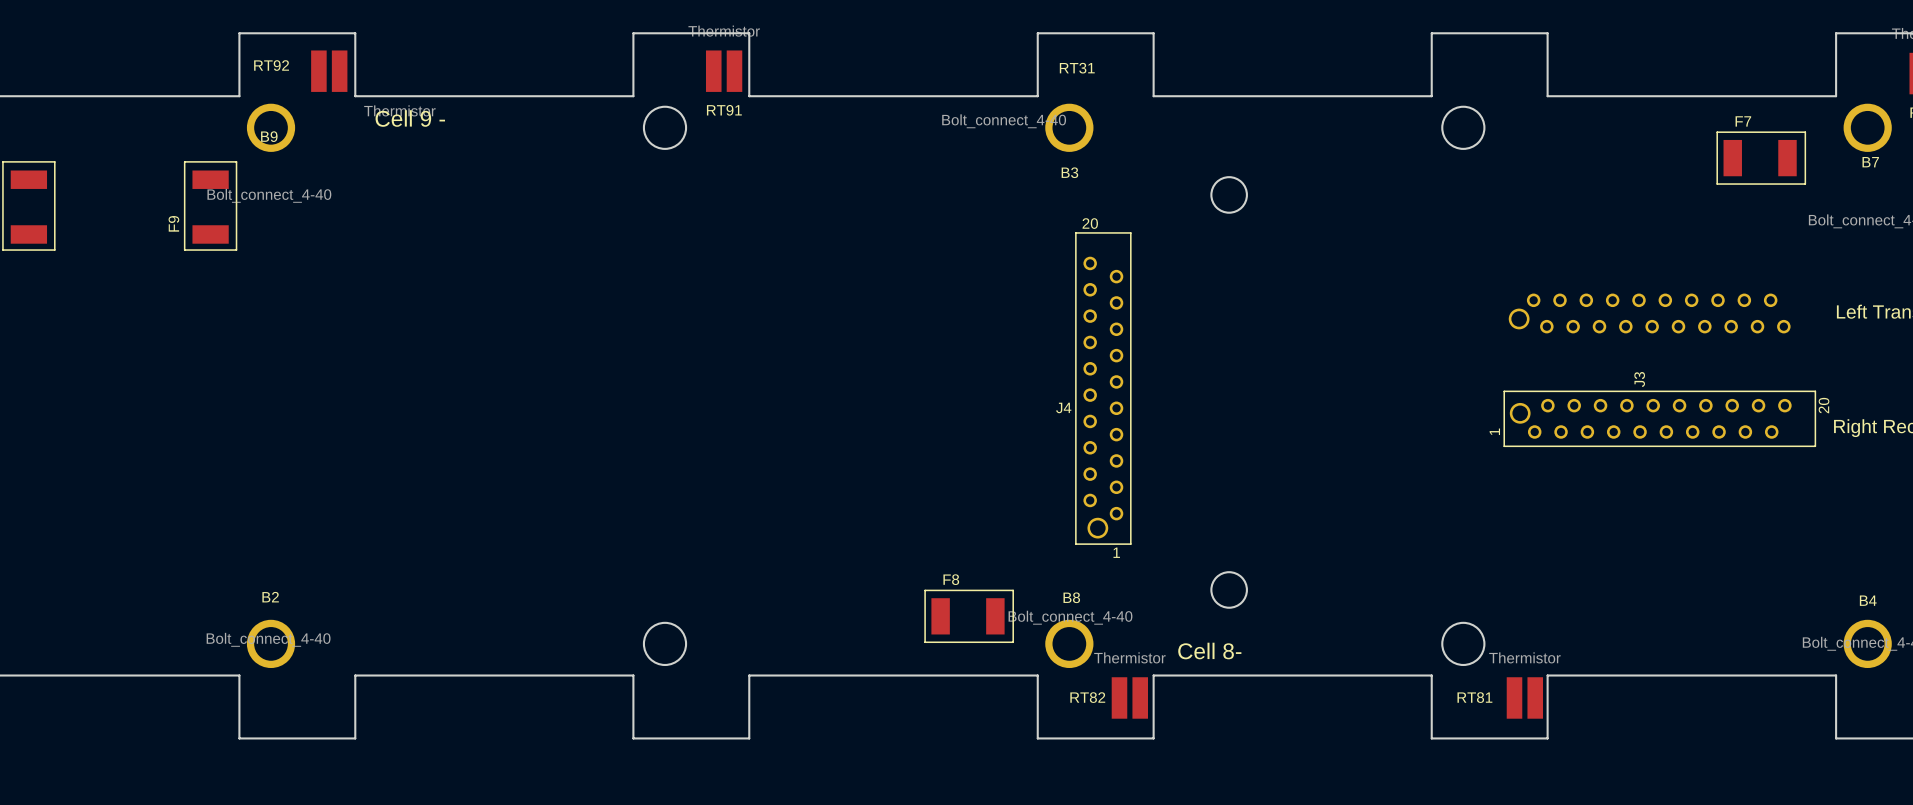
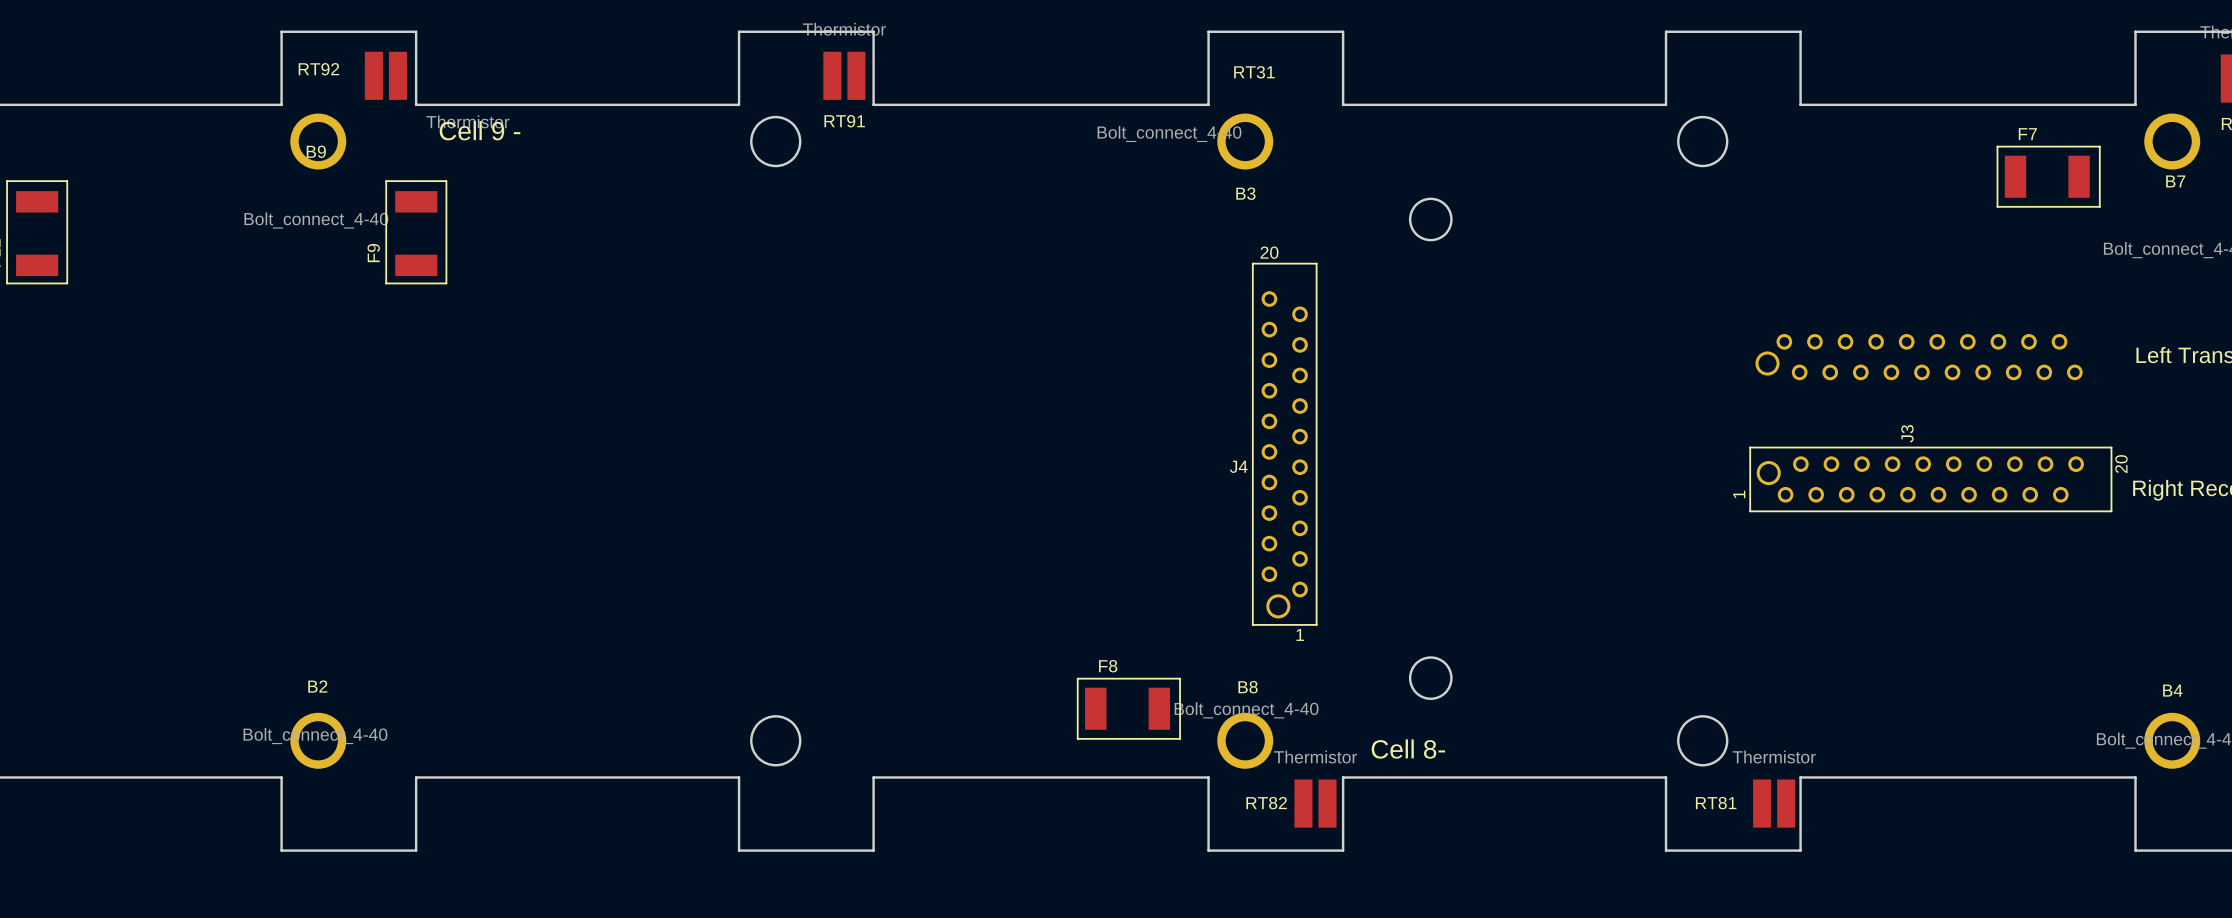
F9 position: (210, 205) -> (416, 232)

